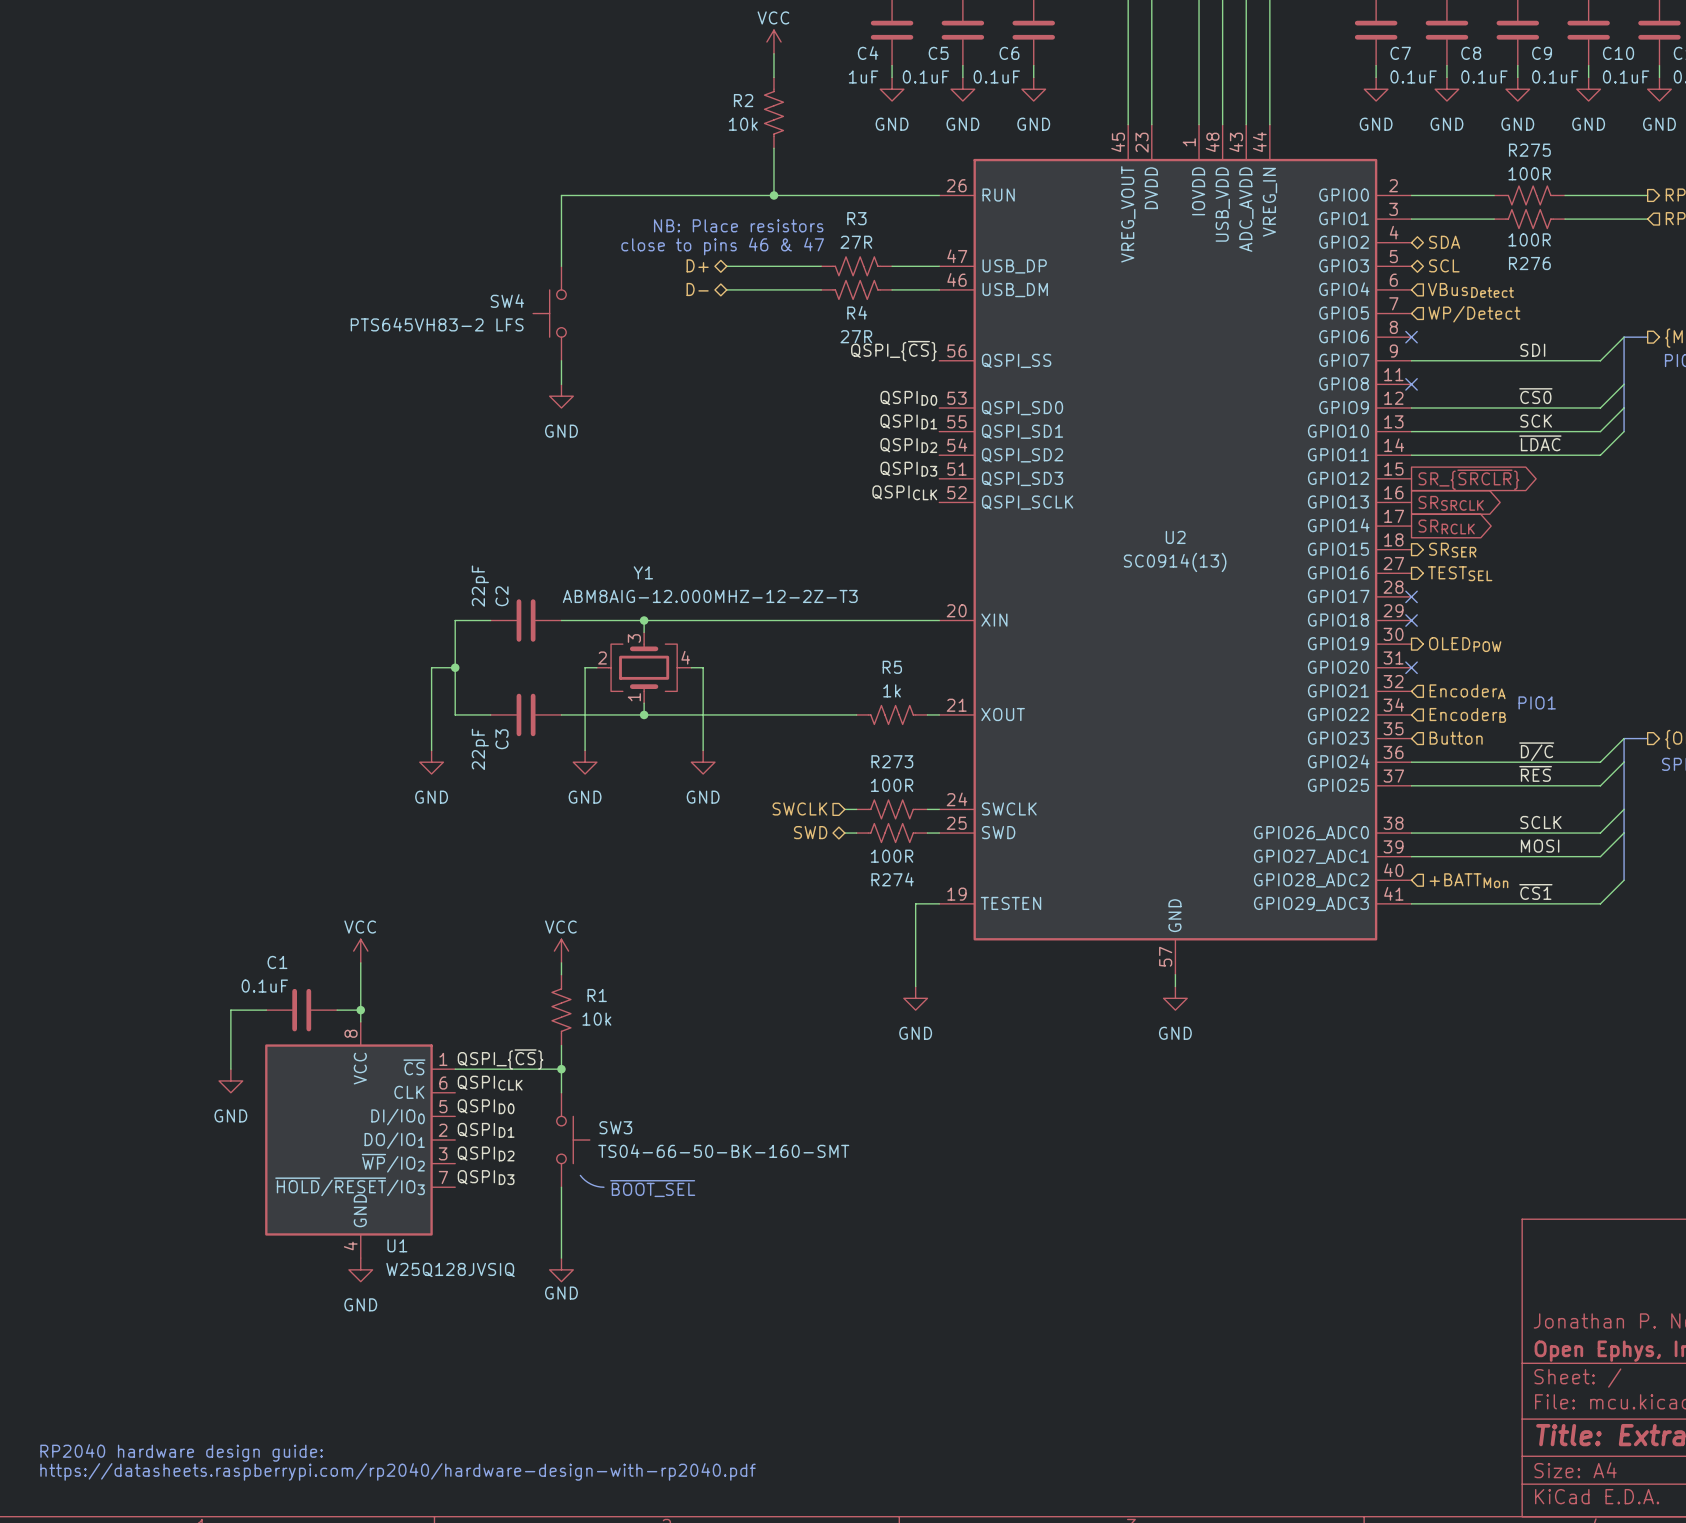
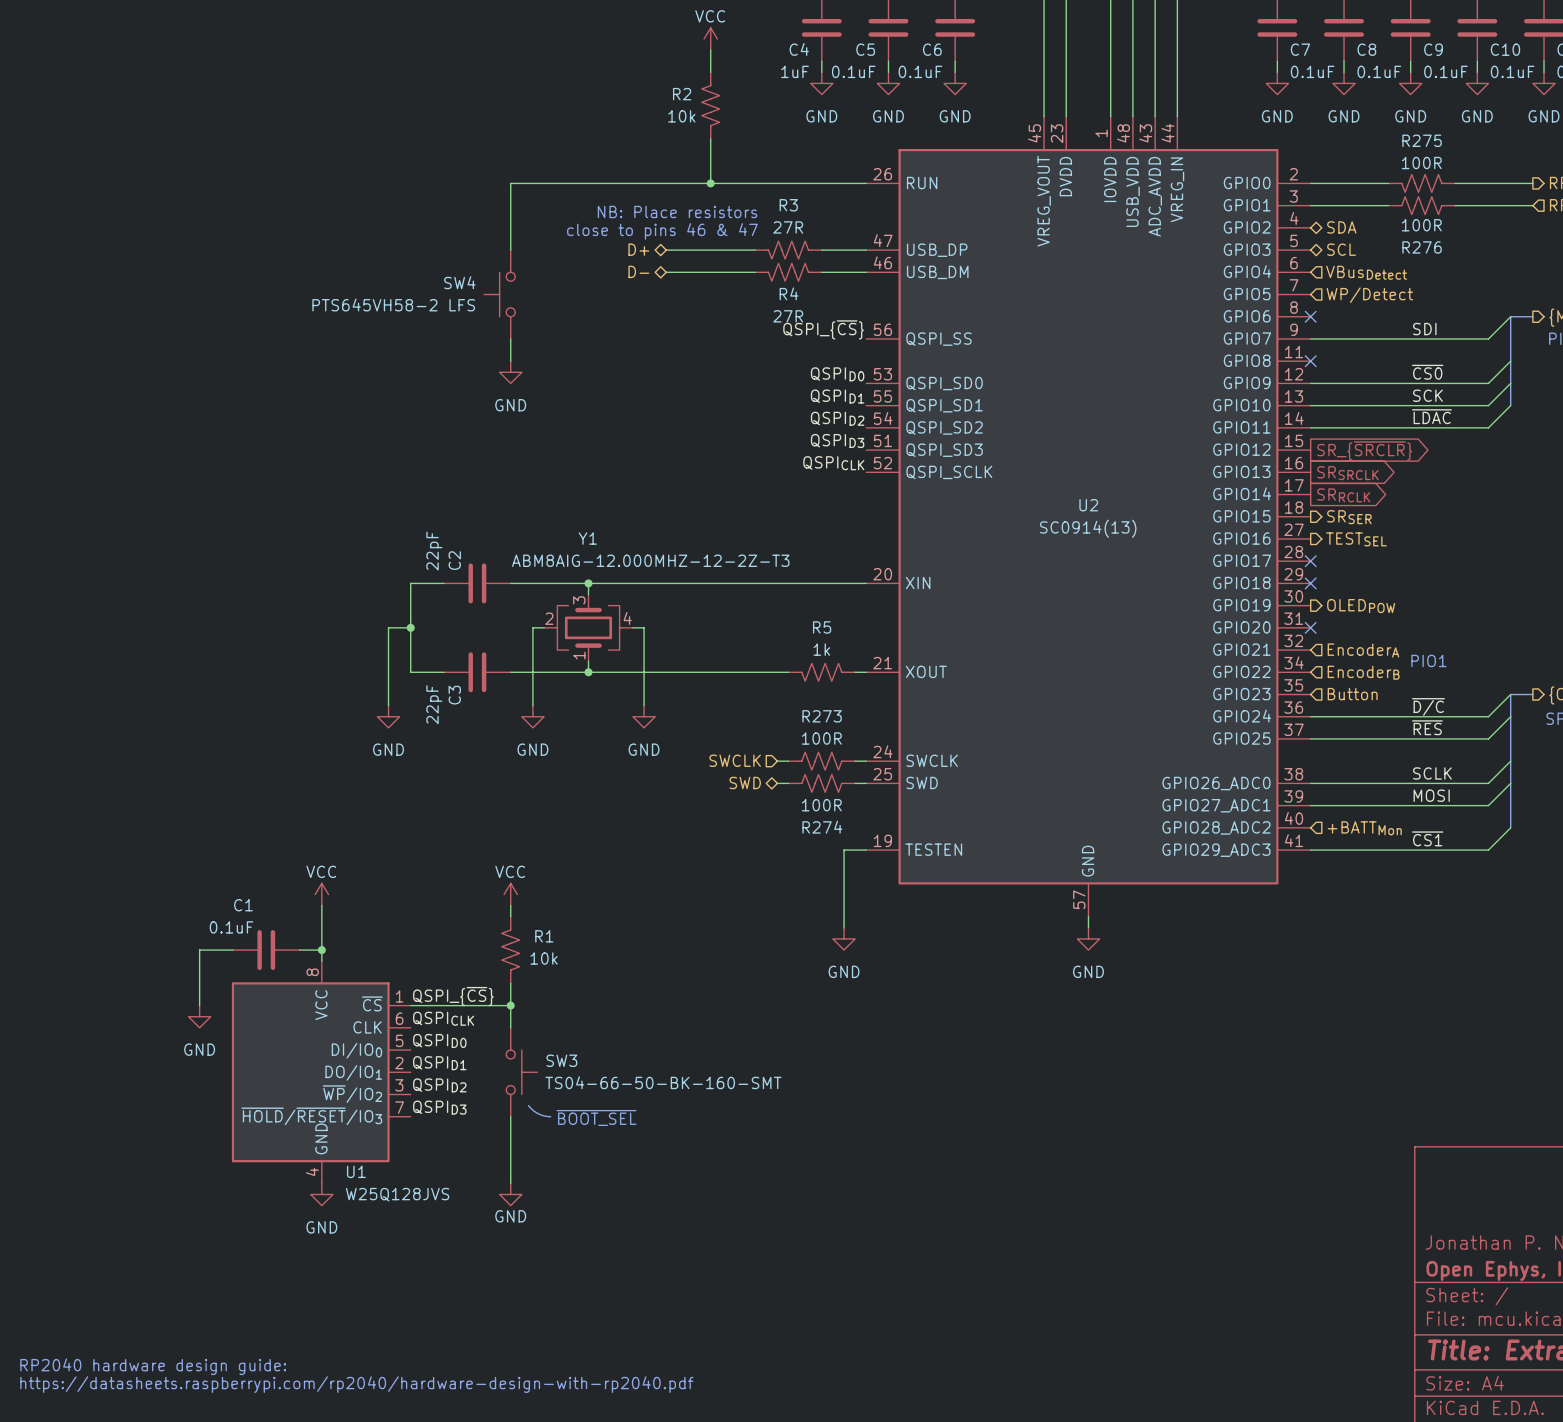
SW4 value: PTS645VH83-2 LFS (437, 324) -> PTS645VH58-2 LFS (393, 304)
U1 value: W25Q128JVSIQ (450, 1269) -> W25Q128JVS (397, 1194)

